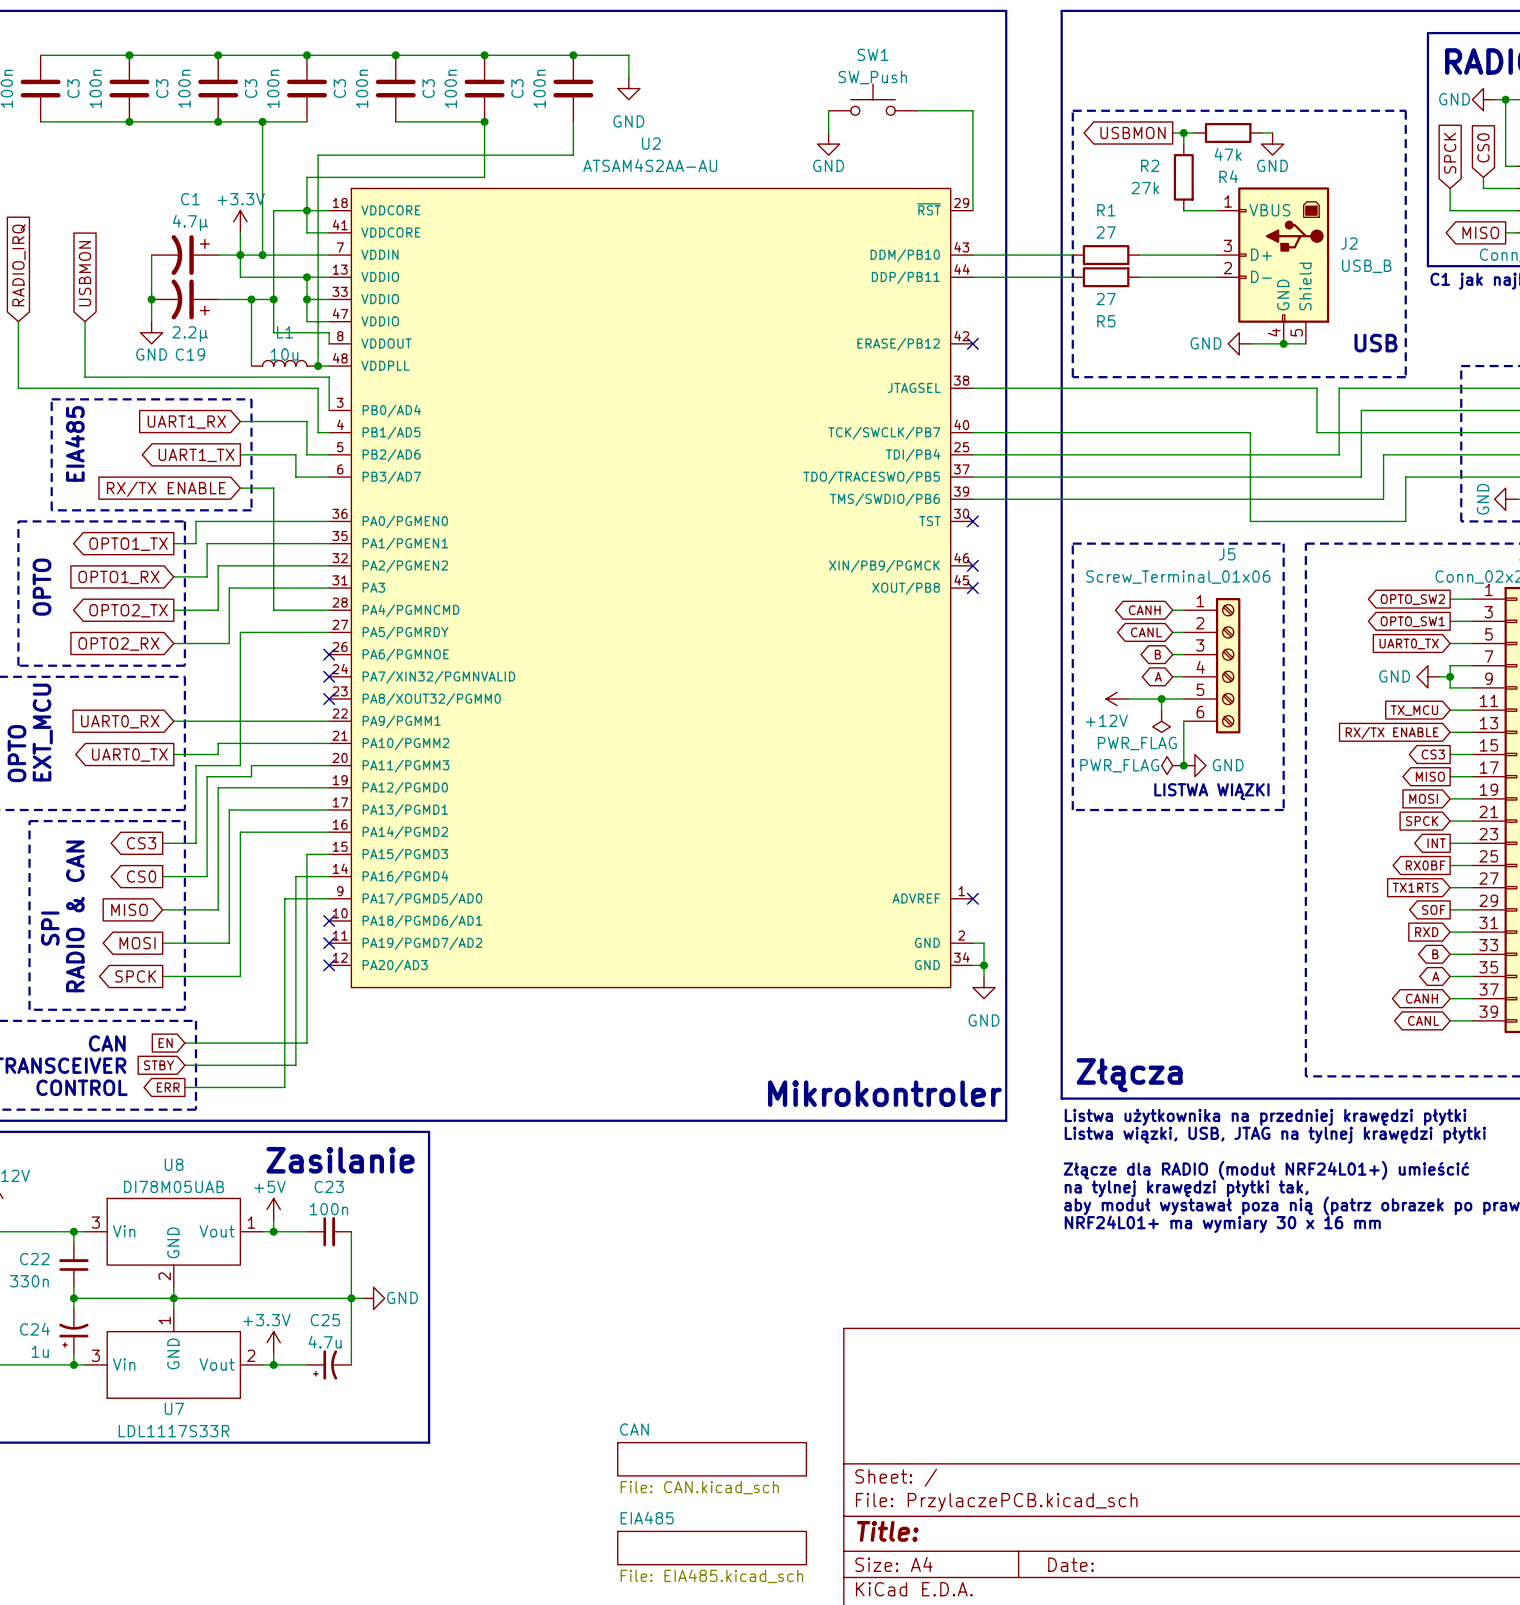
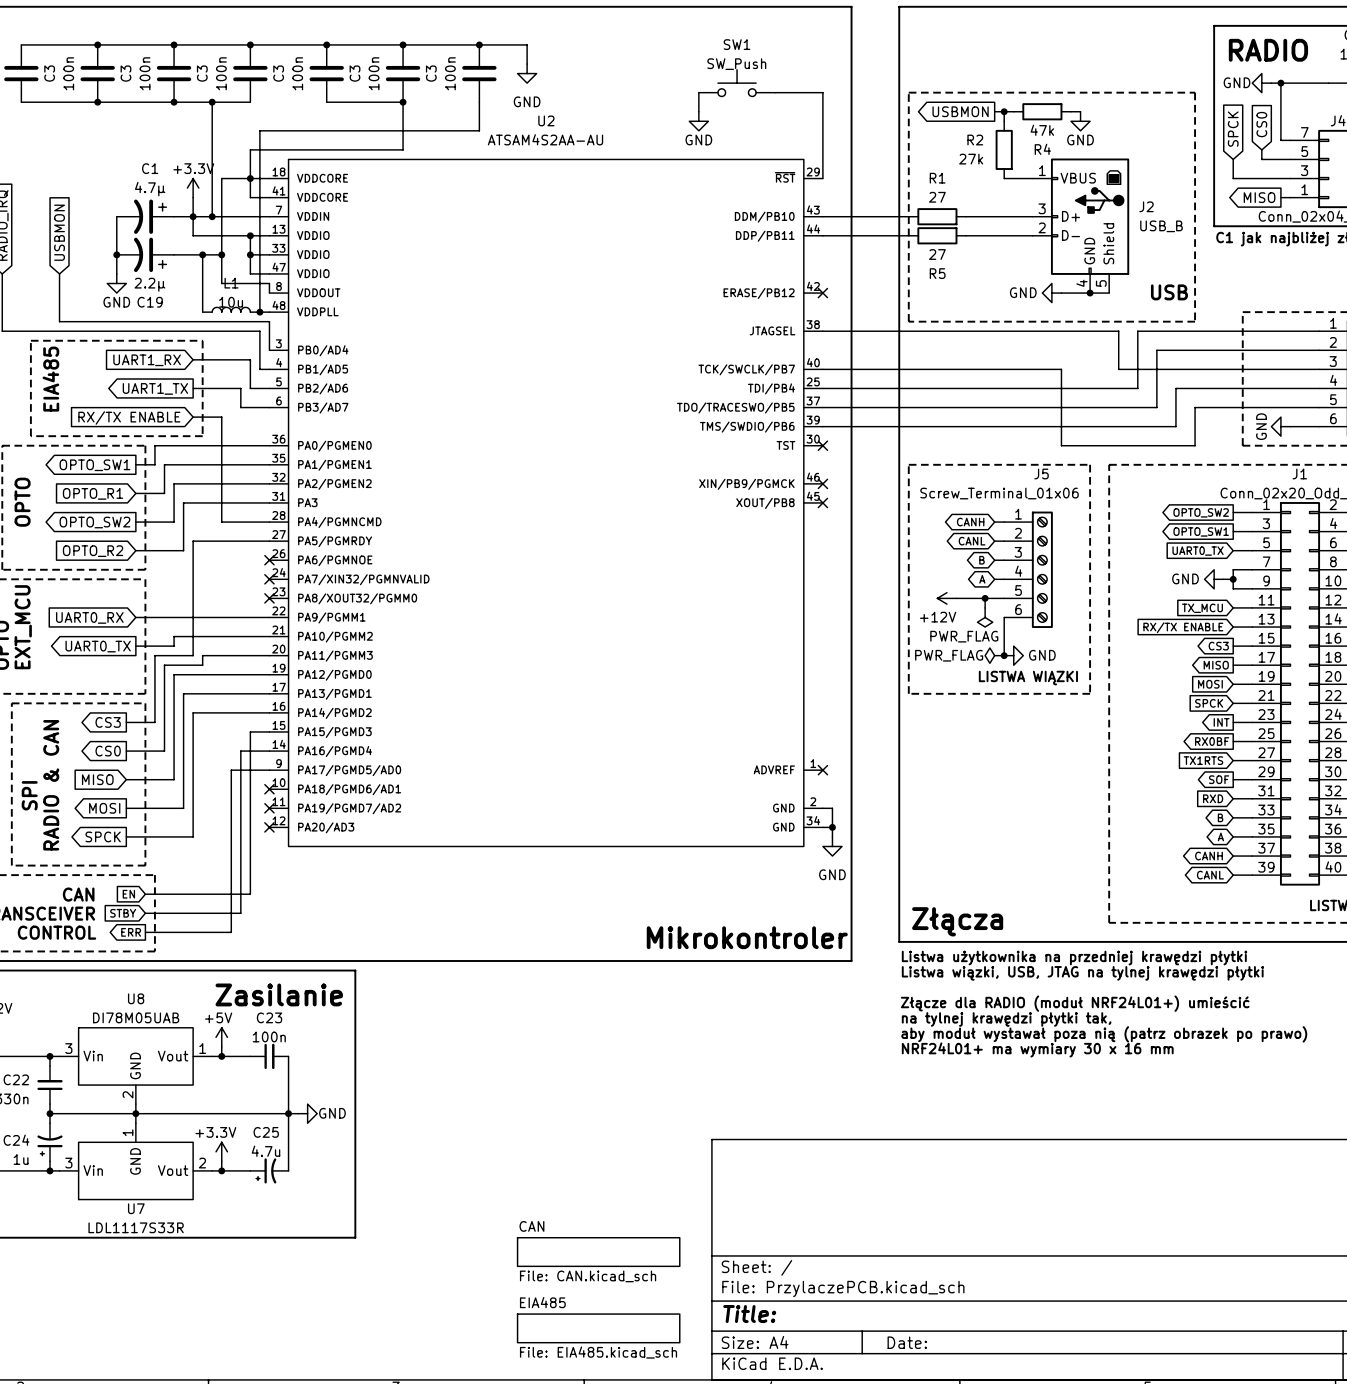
global label: OPTO1_TX (128, 544) -> OPTO_SW1 (94, 465)
global label: OPTO1_RX (118, 577) -> OPTO_R1 (93, 493)
global label: OPTO2_TX (128, 610) -> OPTO_SW2 (94, 522)
global label: OPTO2_RX (118, 644) -> OPTO_R2 (93, 551)

